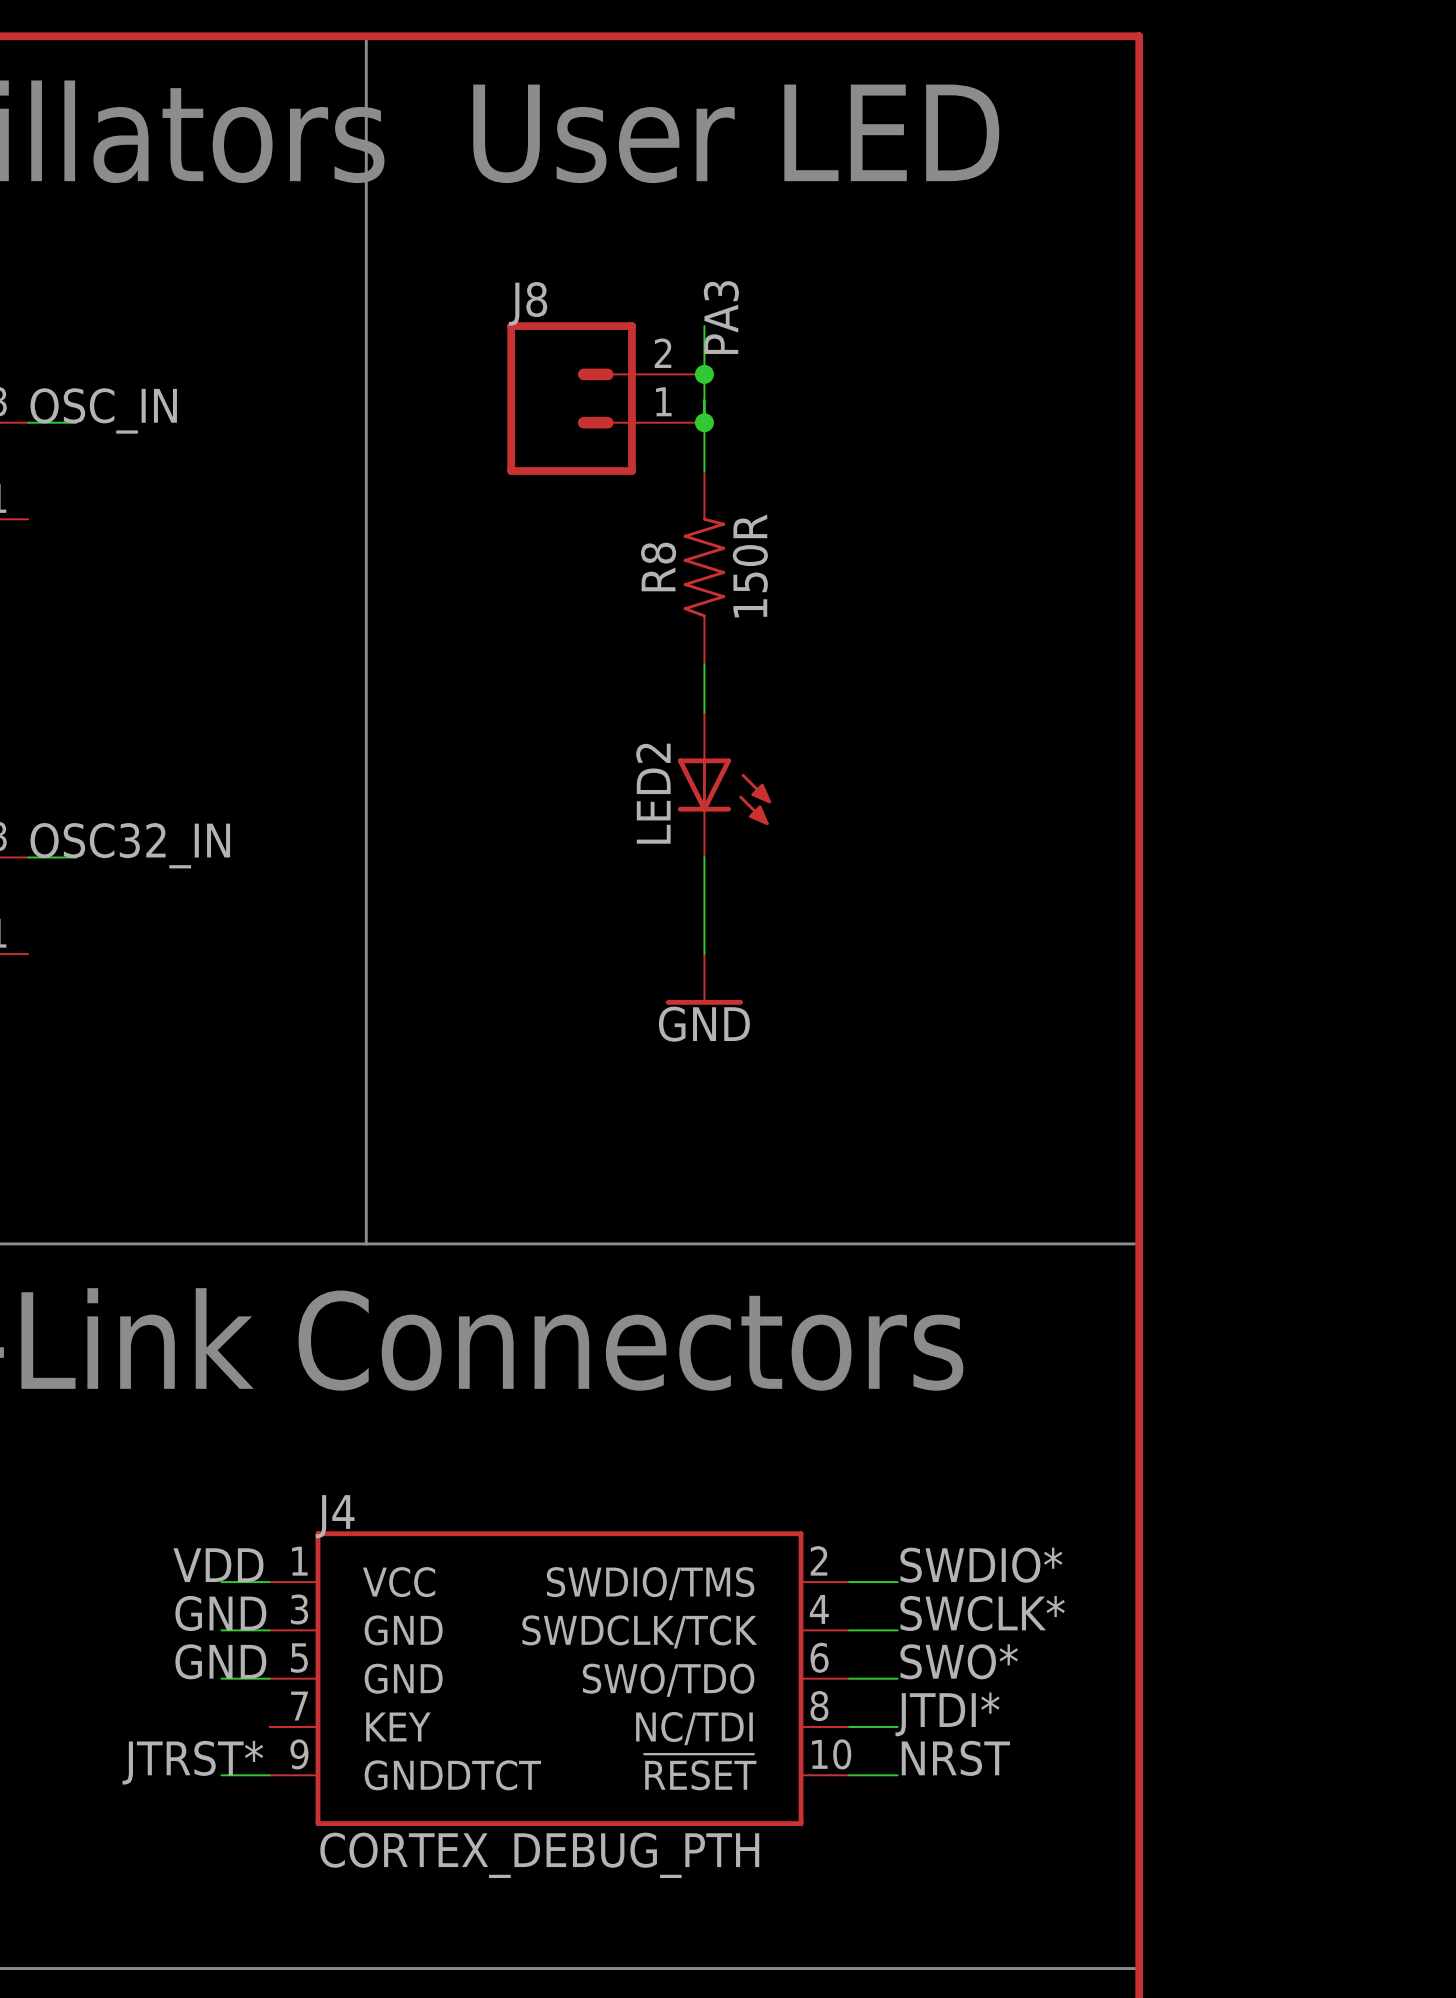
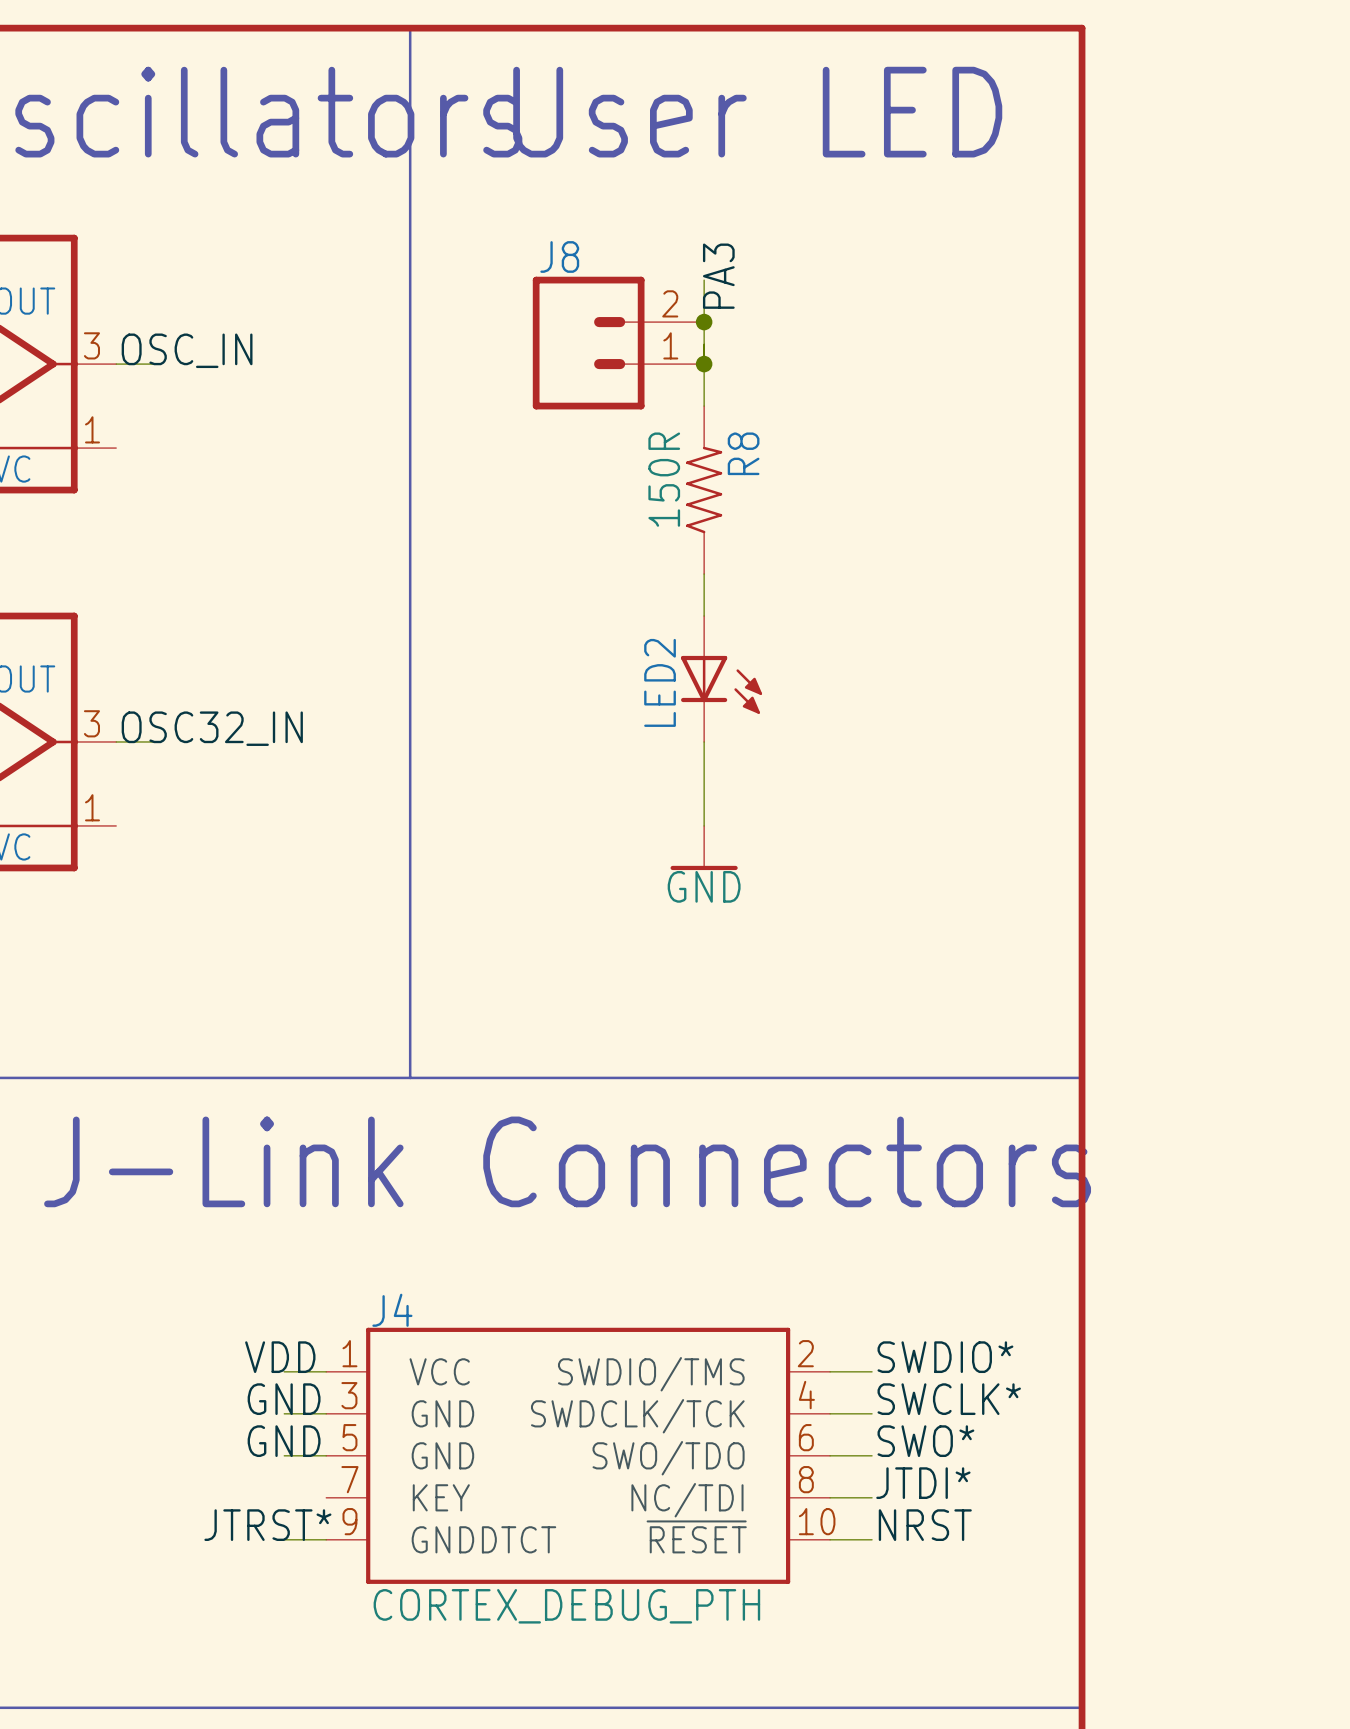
R8 value position: 150R (750, 565) -> 150R (664, 479)
R8 name position: R8 (658, 567) -> R8 (743, 453)

